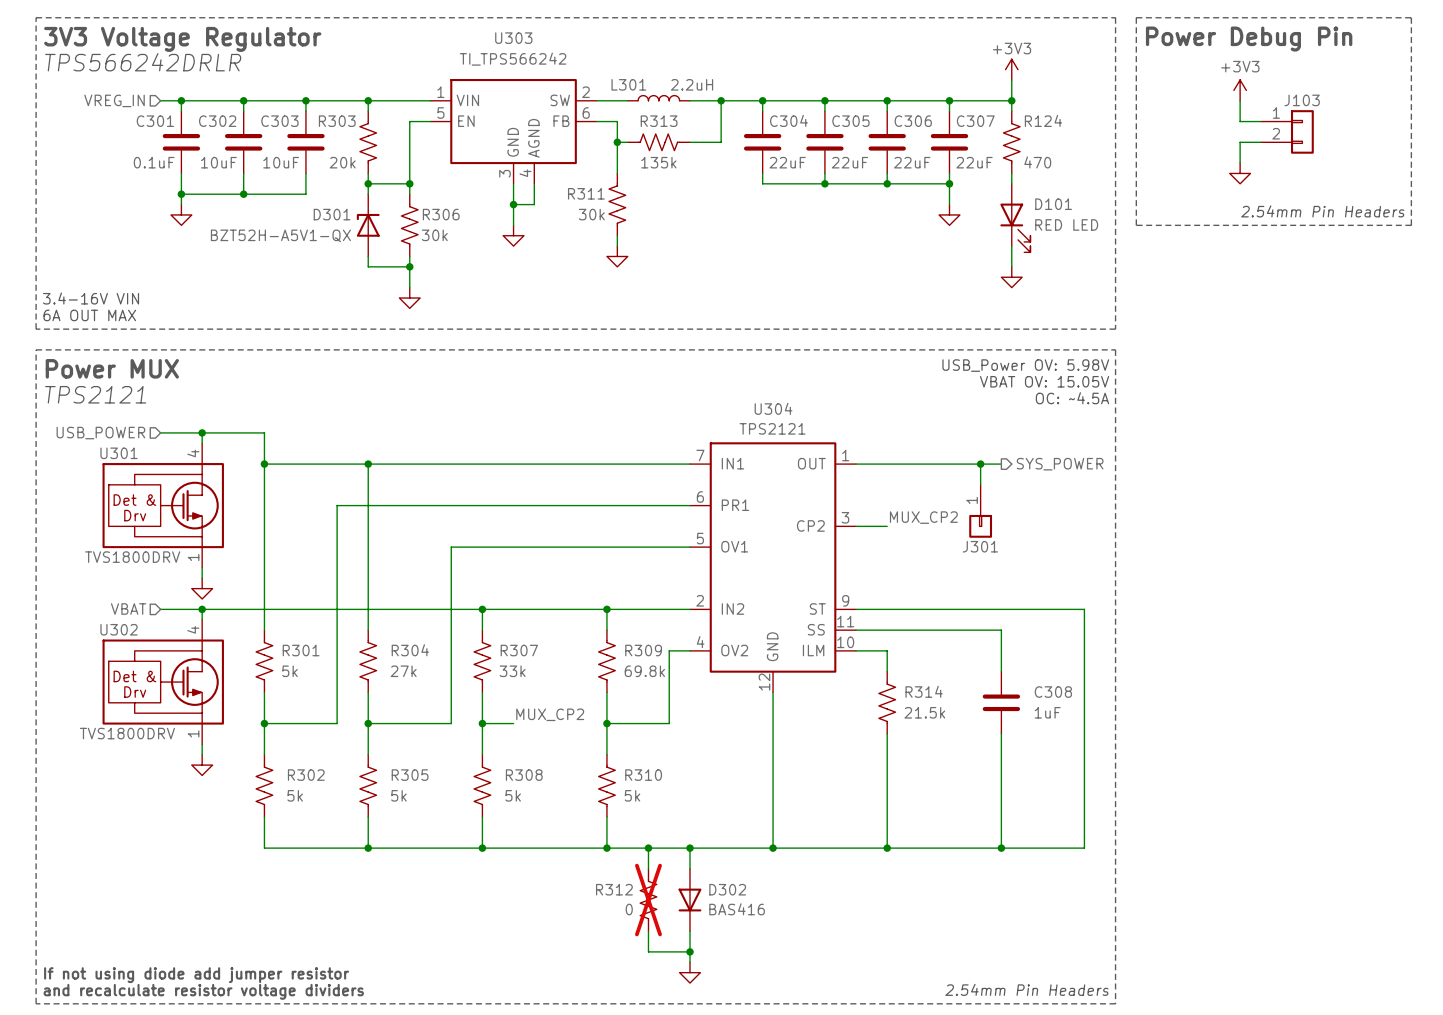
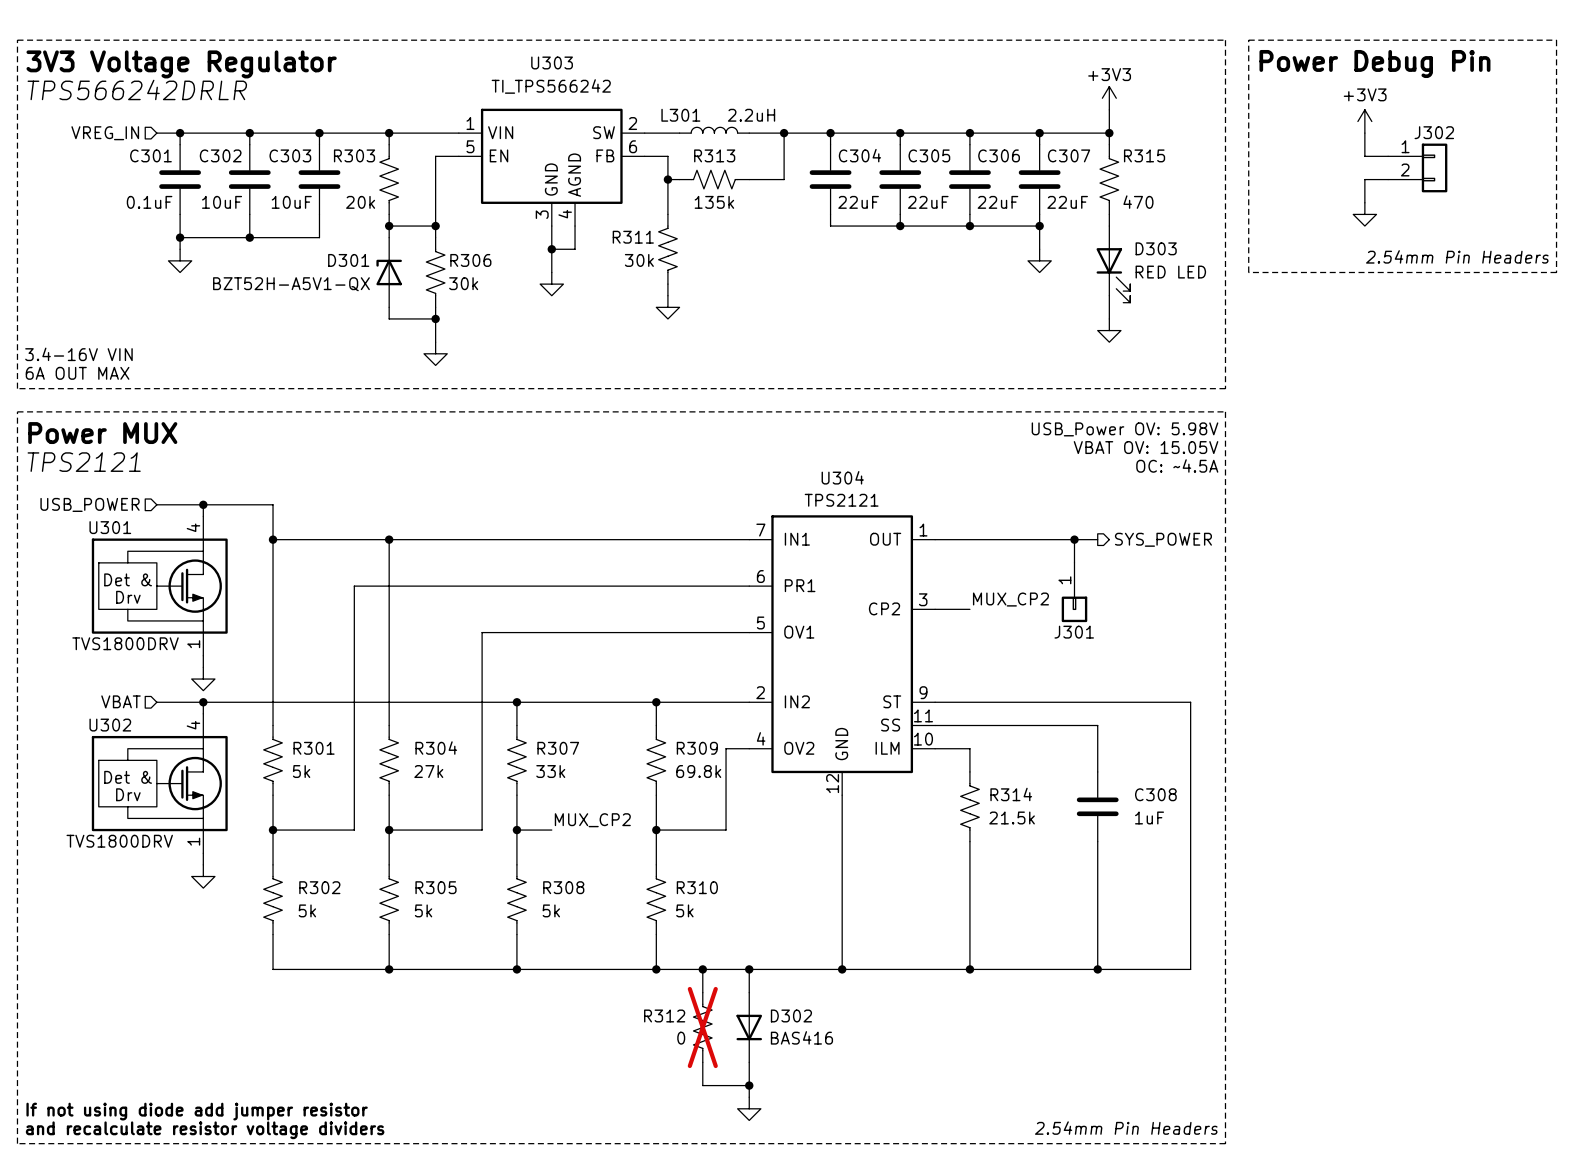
J103 name: J103 (1302, 100) -> J302 (1434, 132)
R124 name: R124 (1043, 120) -> R315 (1144, 155)
D101 name: D101 (1053, 204) -> D303 (1156, 248)

